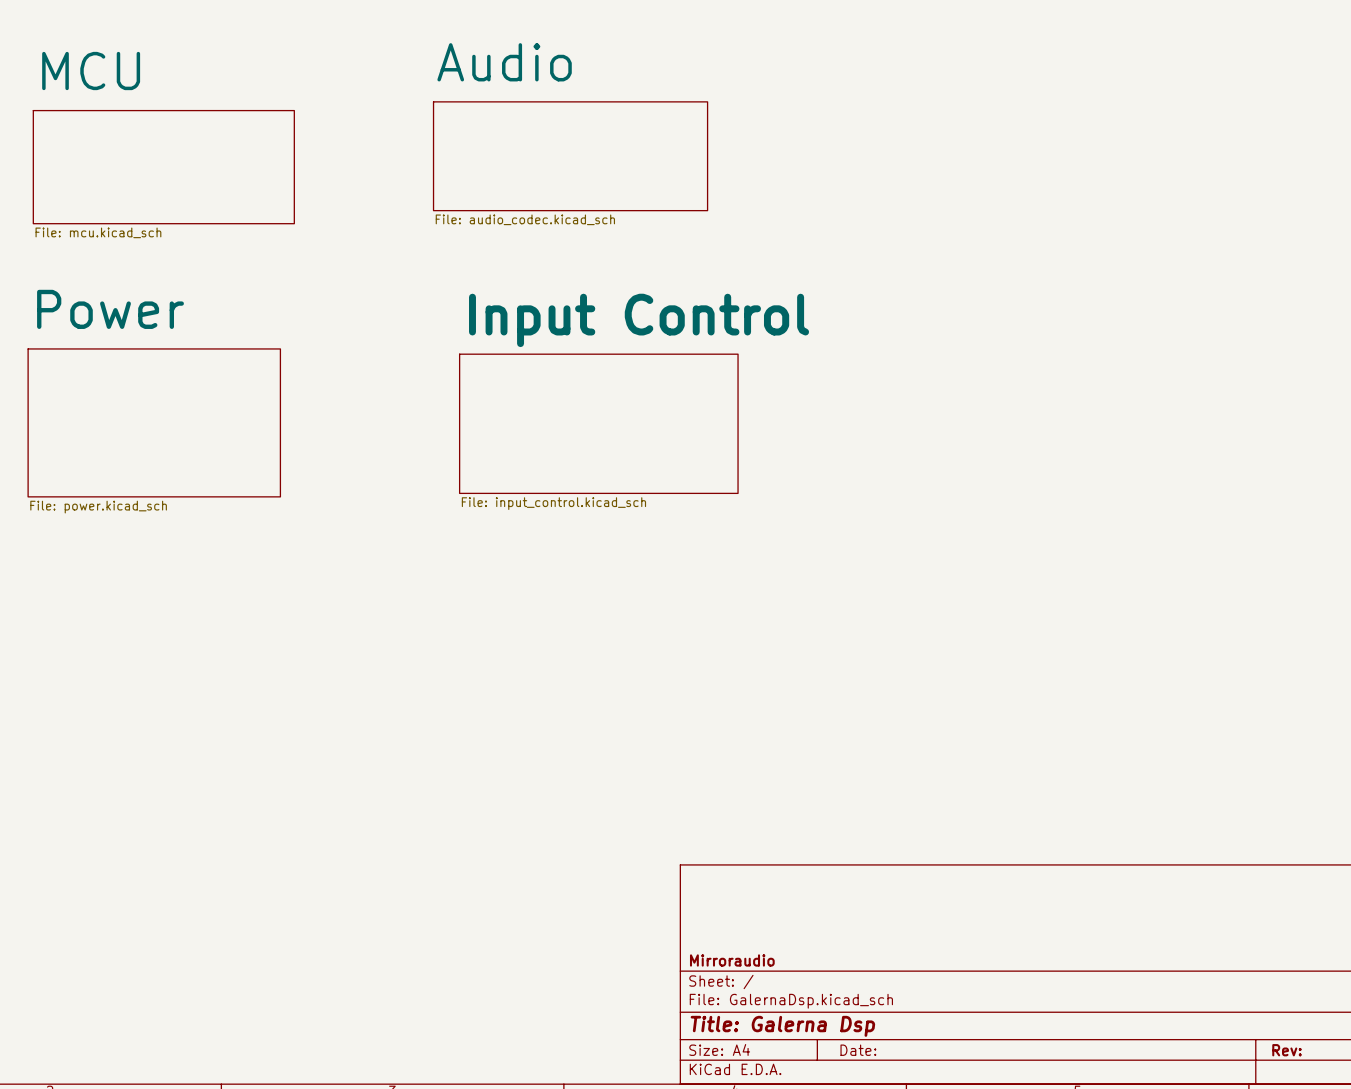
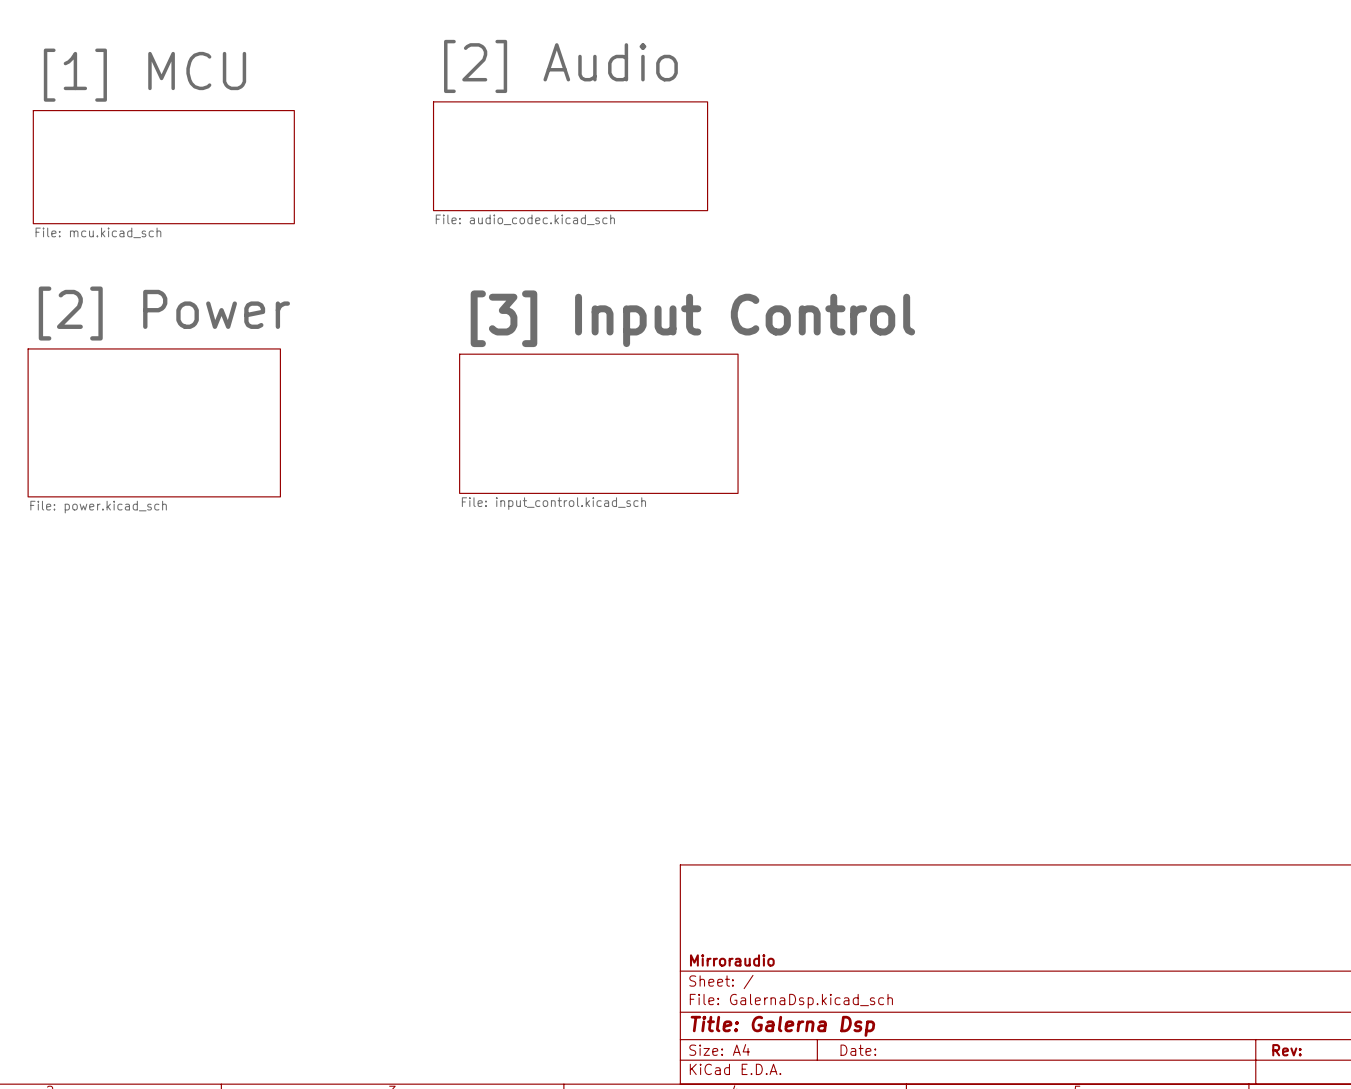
sheet Audio name: Audio (504, 62) -> [2] Audio (560, 66)
sheet MCU name: MCU (91, 71) -> [1] MCU (144, 75)
sheet Power name: Power (110, 309) -> [2] Power (164, 313)
sheet Input Control name: Input Control (639, 320) -> [3] Input Control (692, 318)

